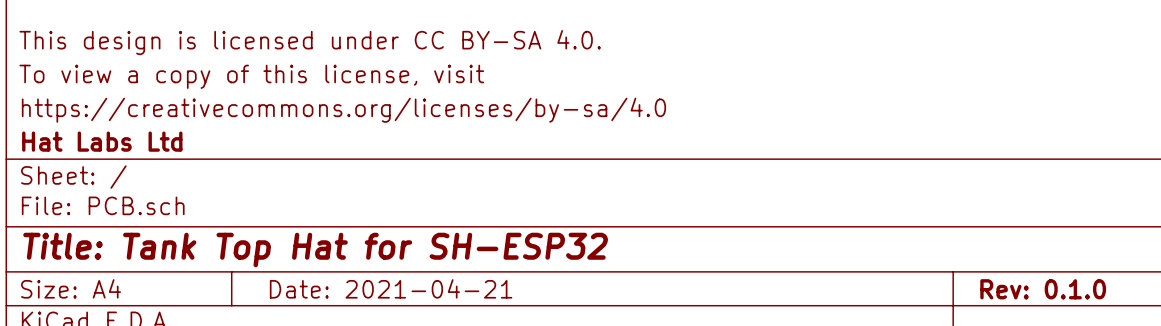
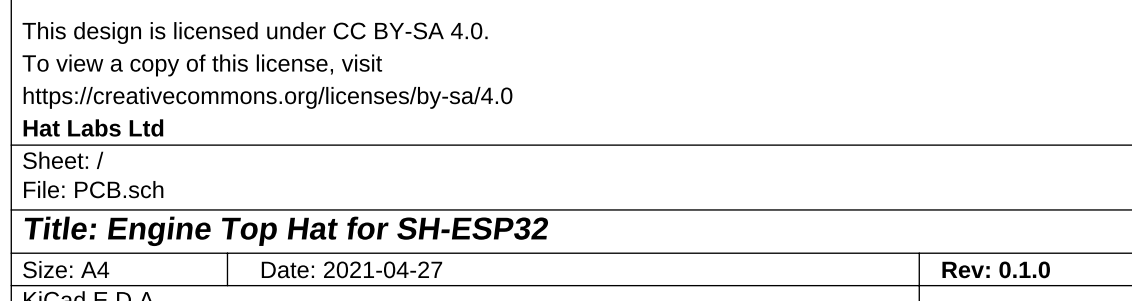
title block: Title: Tank Top Hat for SH-ESP32 (315, 250) -> Title: Engine Top Hat for SH-ESP32 (286, 231)
title block: Date: 2021-04-21 (391, 288) -> Date: 2021-04-27 (351, 269)

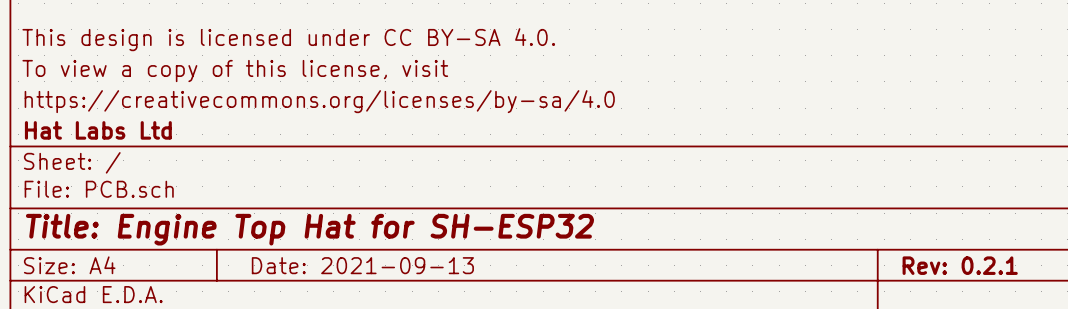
title block: Date: 2021-04-27 (351, 269) -> Date: 2021-09-13 (362, 265)
title block: Rev: 0.1.0 (996, 269) -> Rev: 0.2.1 (960, 265)

